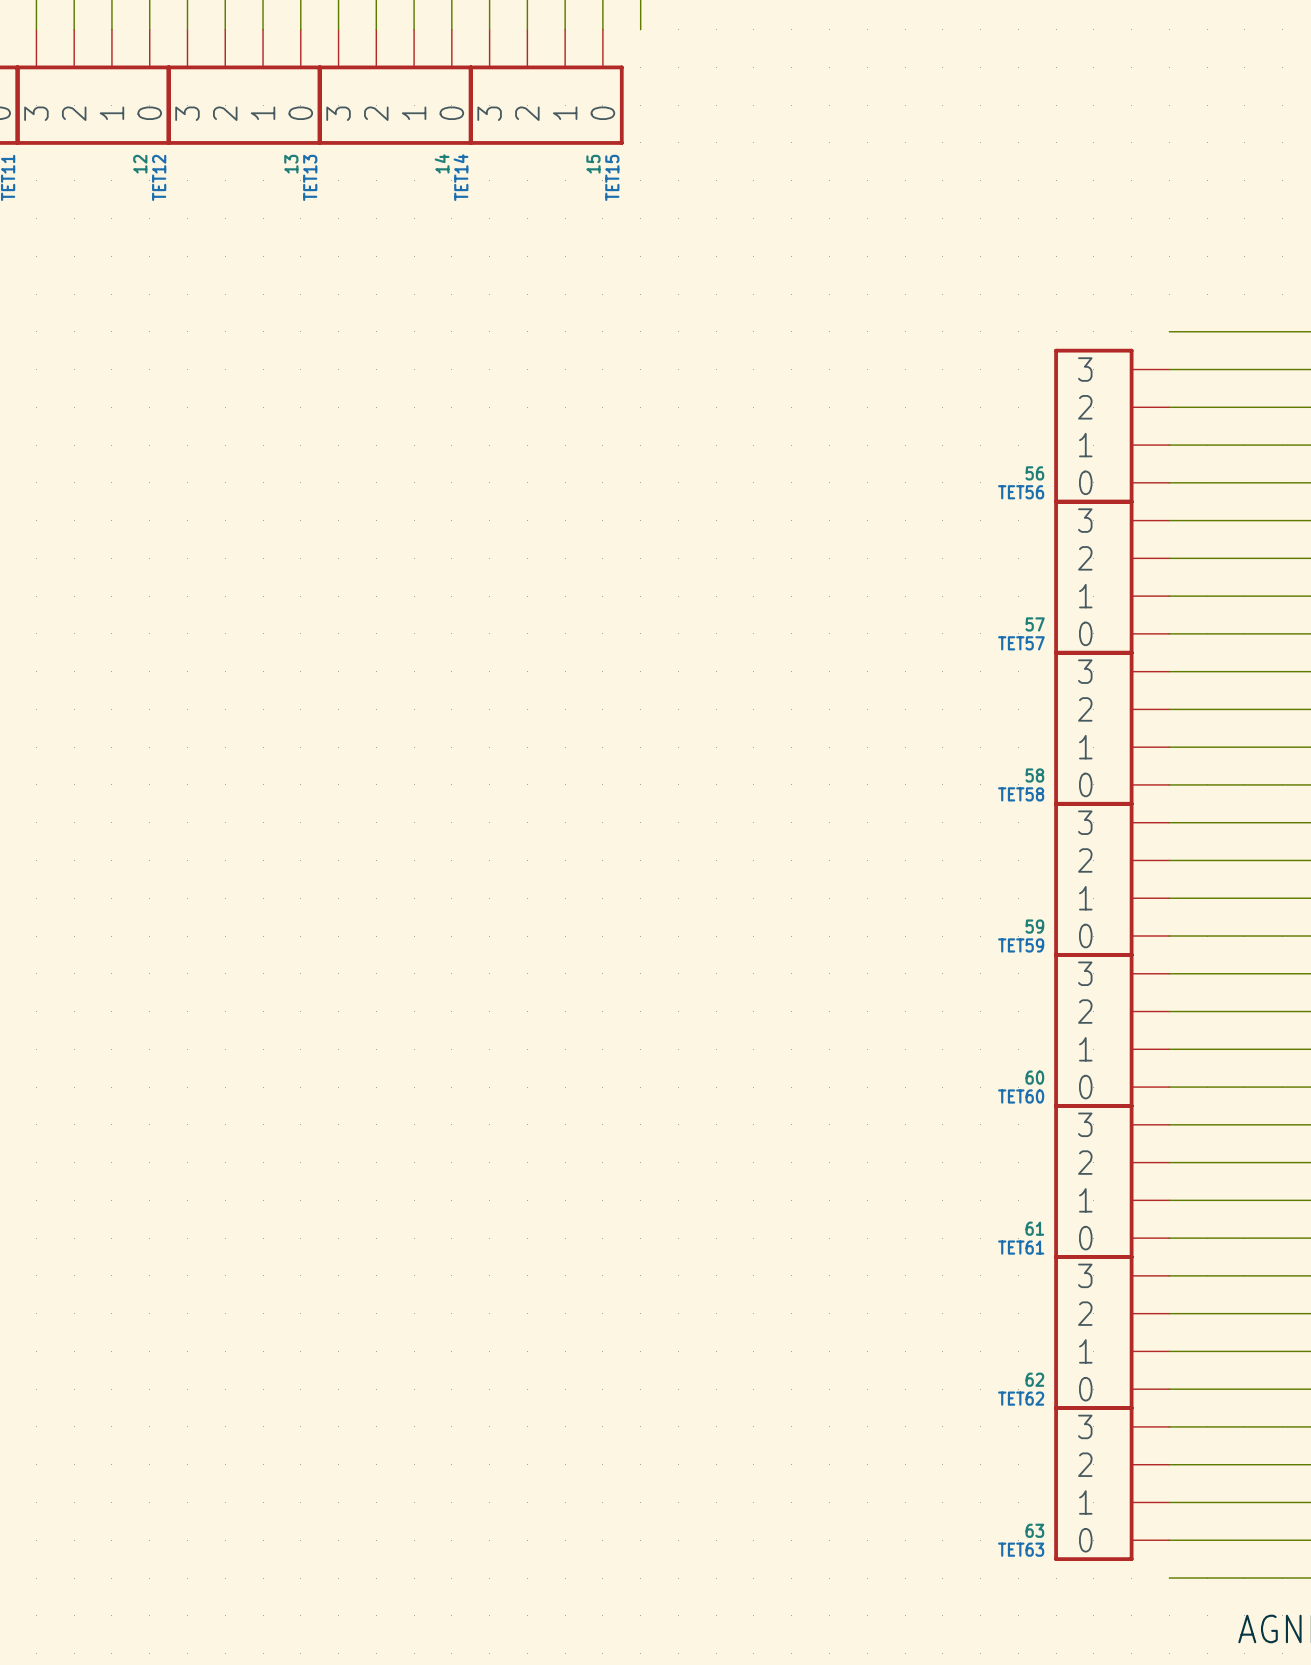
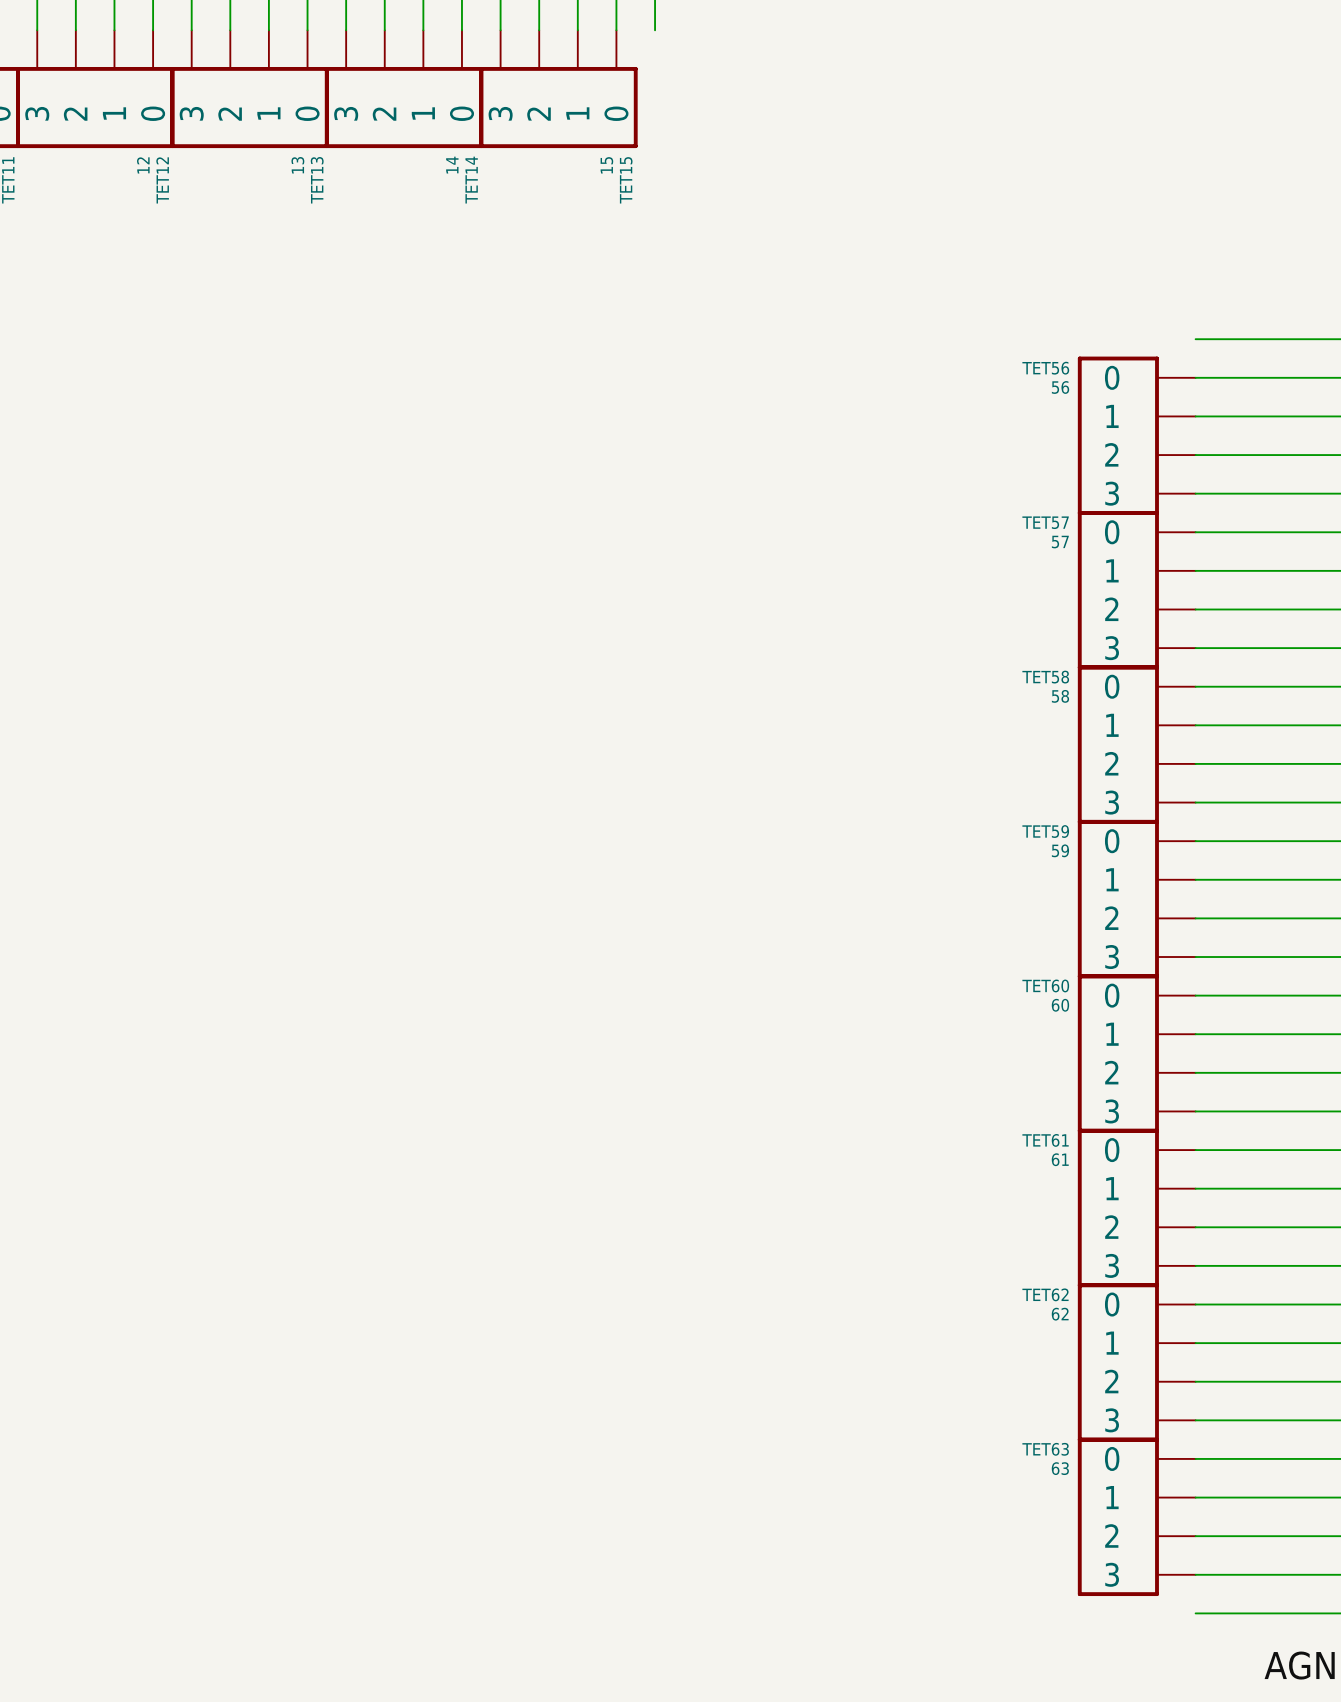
TET56 flip: as is (1093, 426) -> up-down (1118, 435)
TET57 flip: as is (1093, 577) -> up-down (1118, 590)
TET58 flip: as is (1093, 728) -> up-down (1118, 744)
TET59 flip: as is (1093, 879) -> up-down (1118, 899)
TET60 flip: as is (1093, 1030) -> up-down (1118, 1053)
TET61 flip: as is (1093, 1181) -> up-down (1118, 1207)
TET62 flip: as is (1093, 1332) -> up-down (1118, 1362)
TET63 flip: as is (1093, 1483) -> up-down (1118, 1516)

